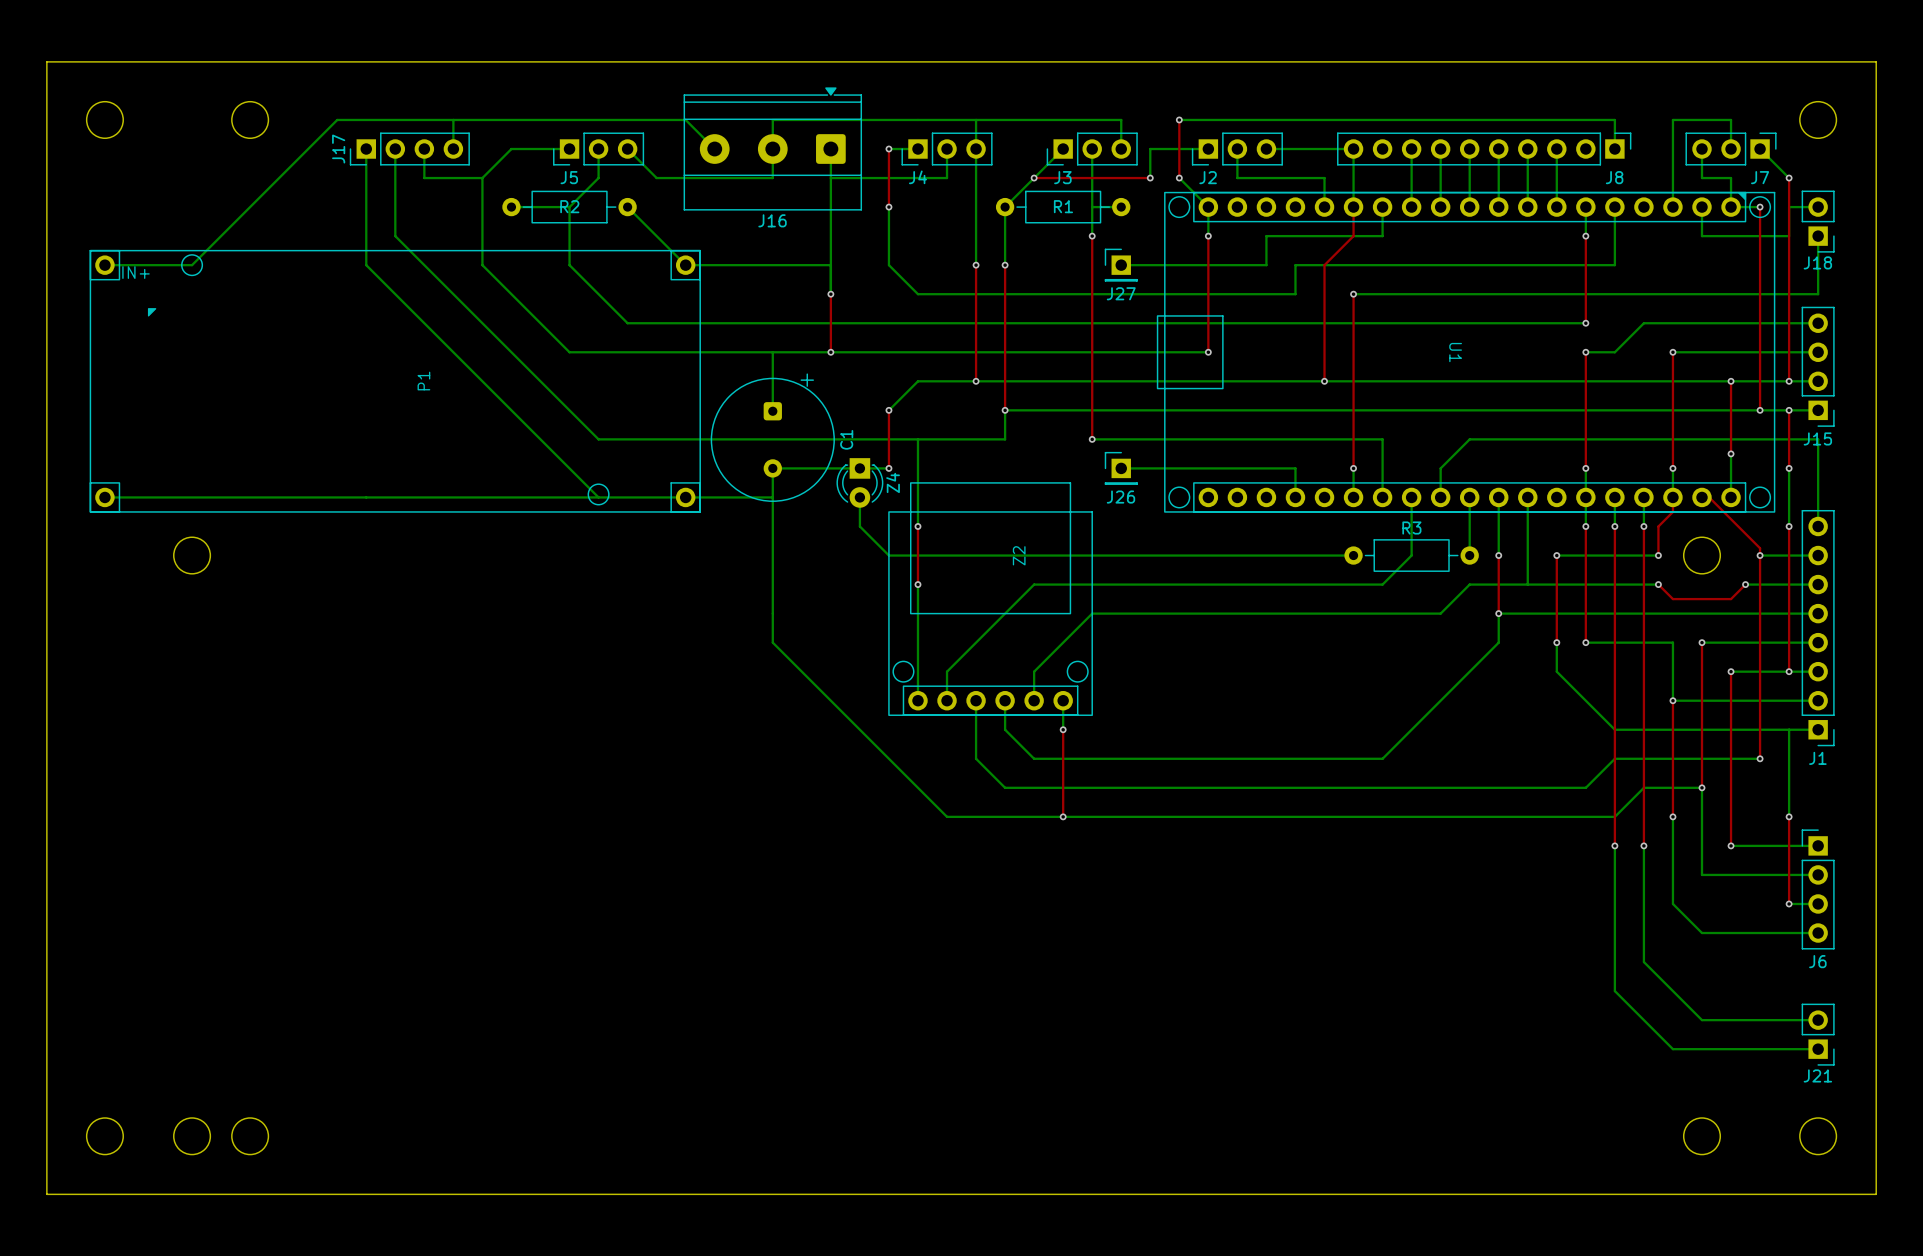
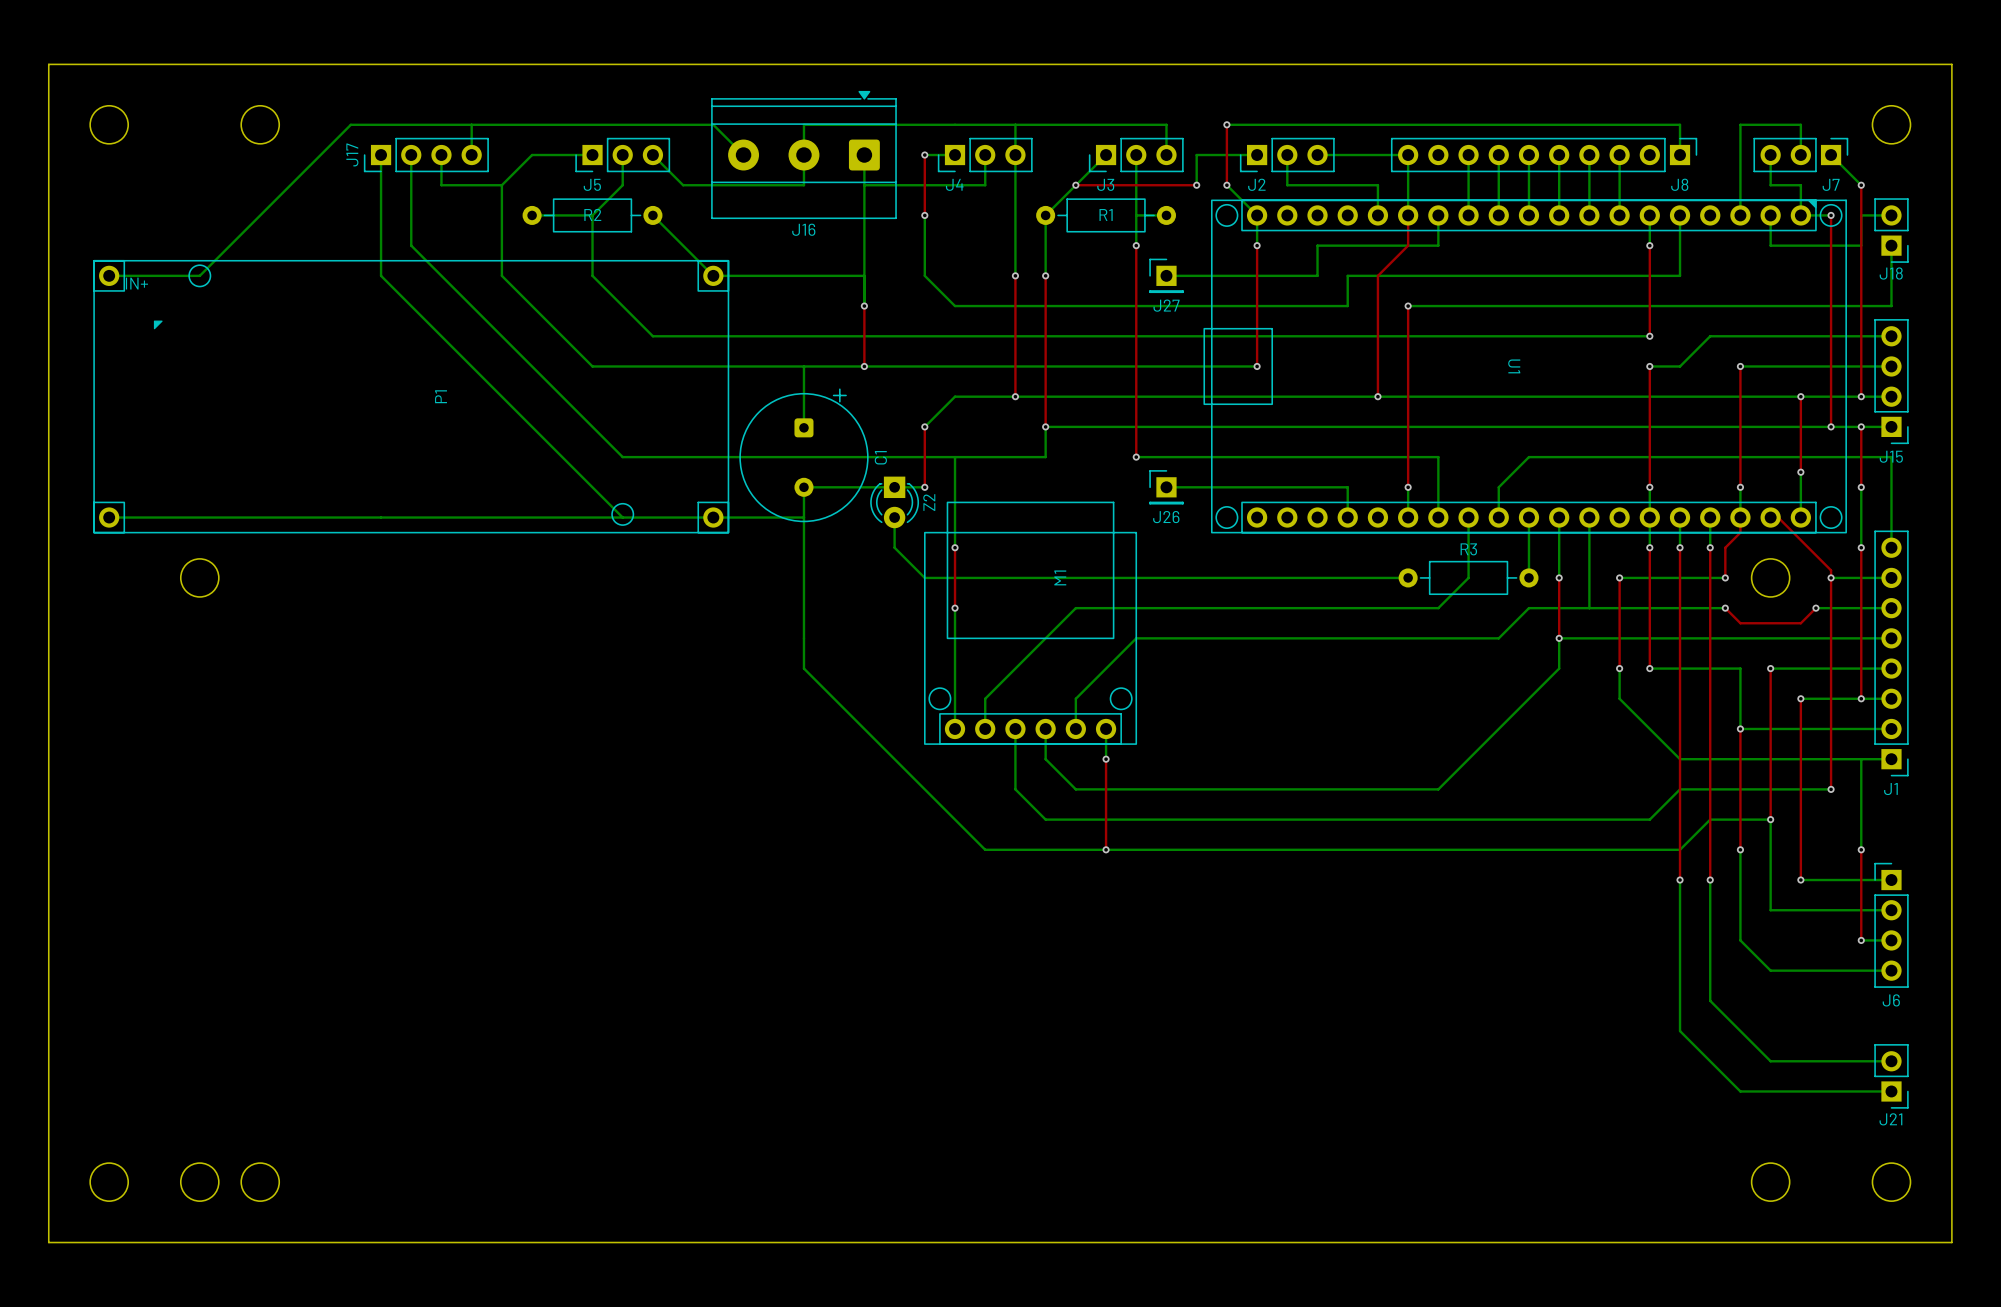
Z4 name: Z4 (893, 482) -> Z2 (929, 502)
Z2 name: Z2 (1019, 555) -> M1 (1060, 577)

